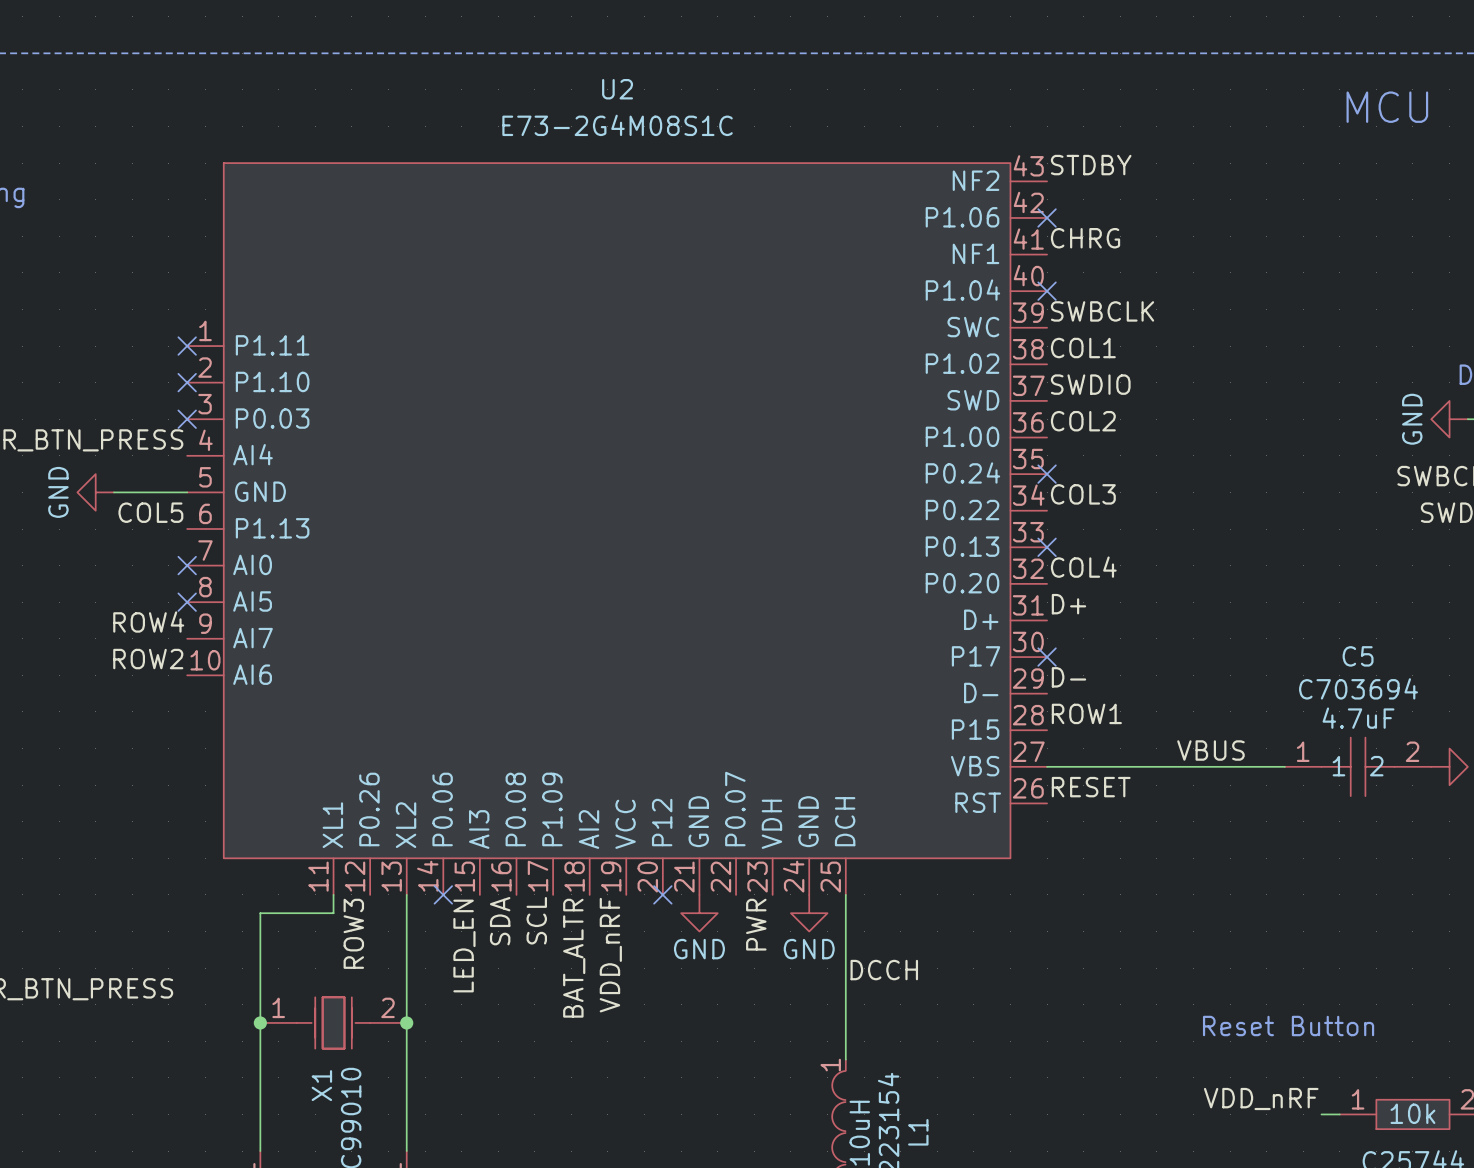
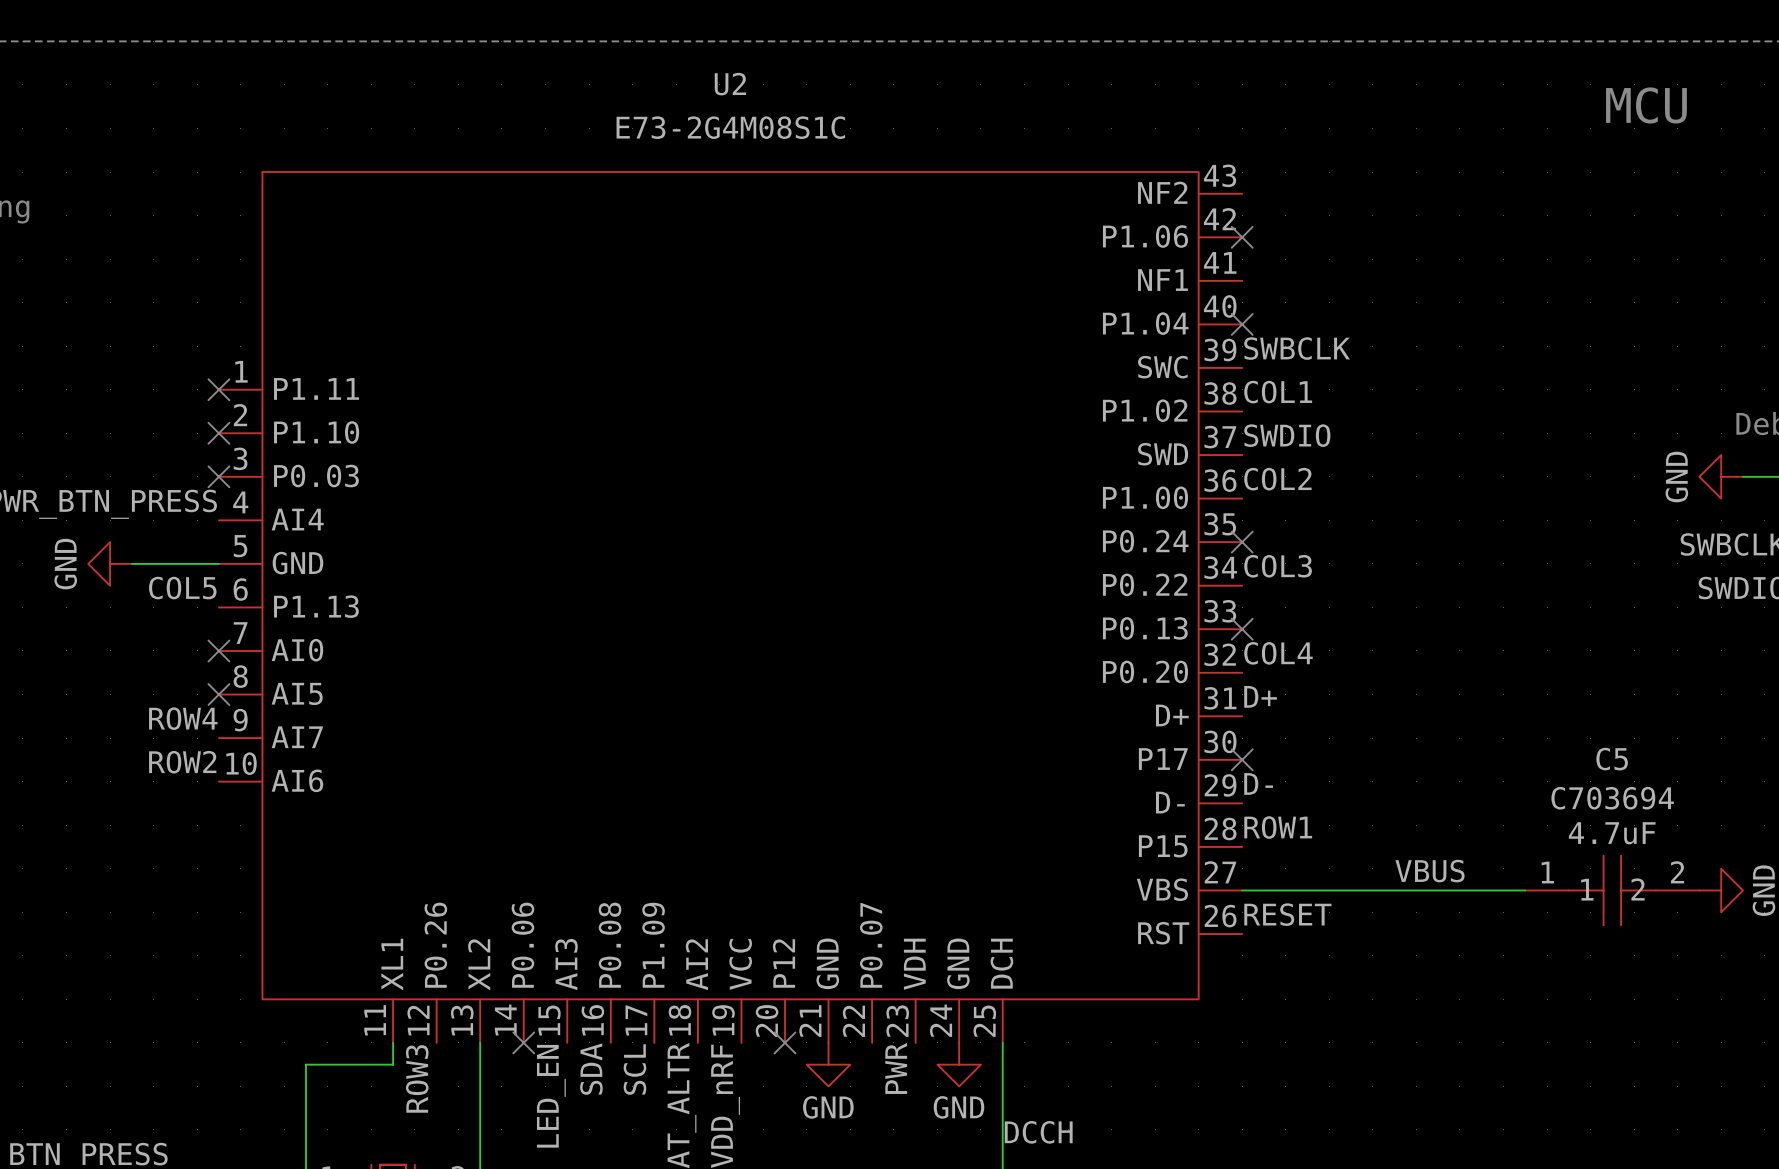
label: STDBY (1091, 165) -> none
label: CHRG (1085, 238) -> none

